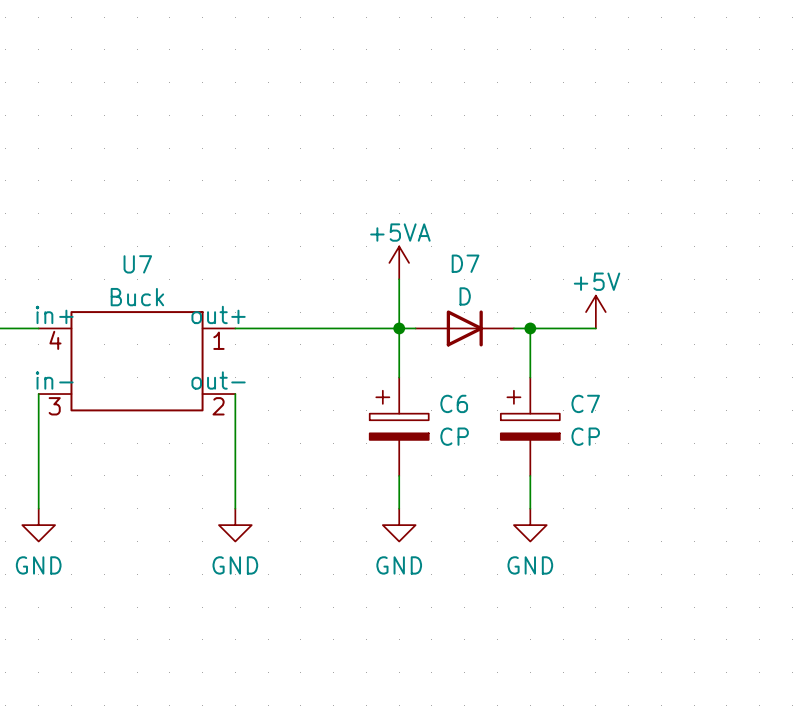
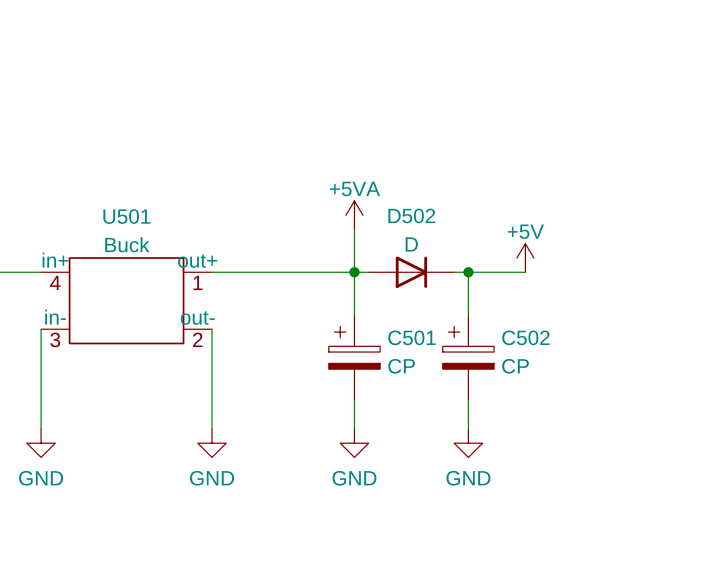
D7 name: D7 (465, 263) -> D502 (411, 215)
U7 name: U7 (137, 264) -> U501 (126, 216)
C6 name: C6 (454, 403) -> C501 (411, 337)
C7 name: C7 (585, 403) -> C502 (525, 337)

